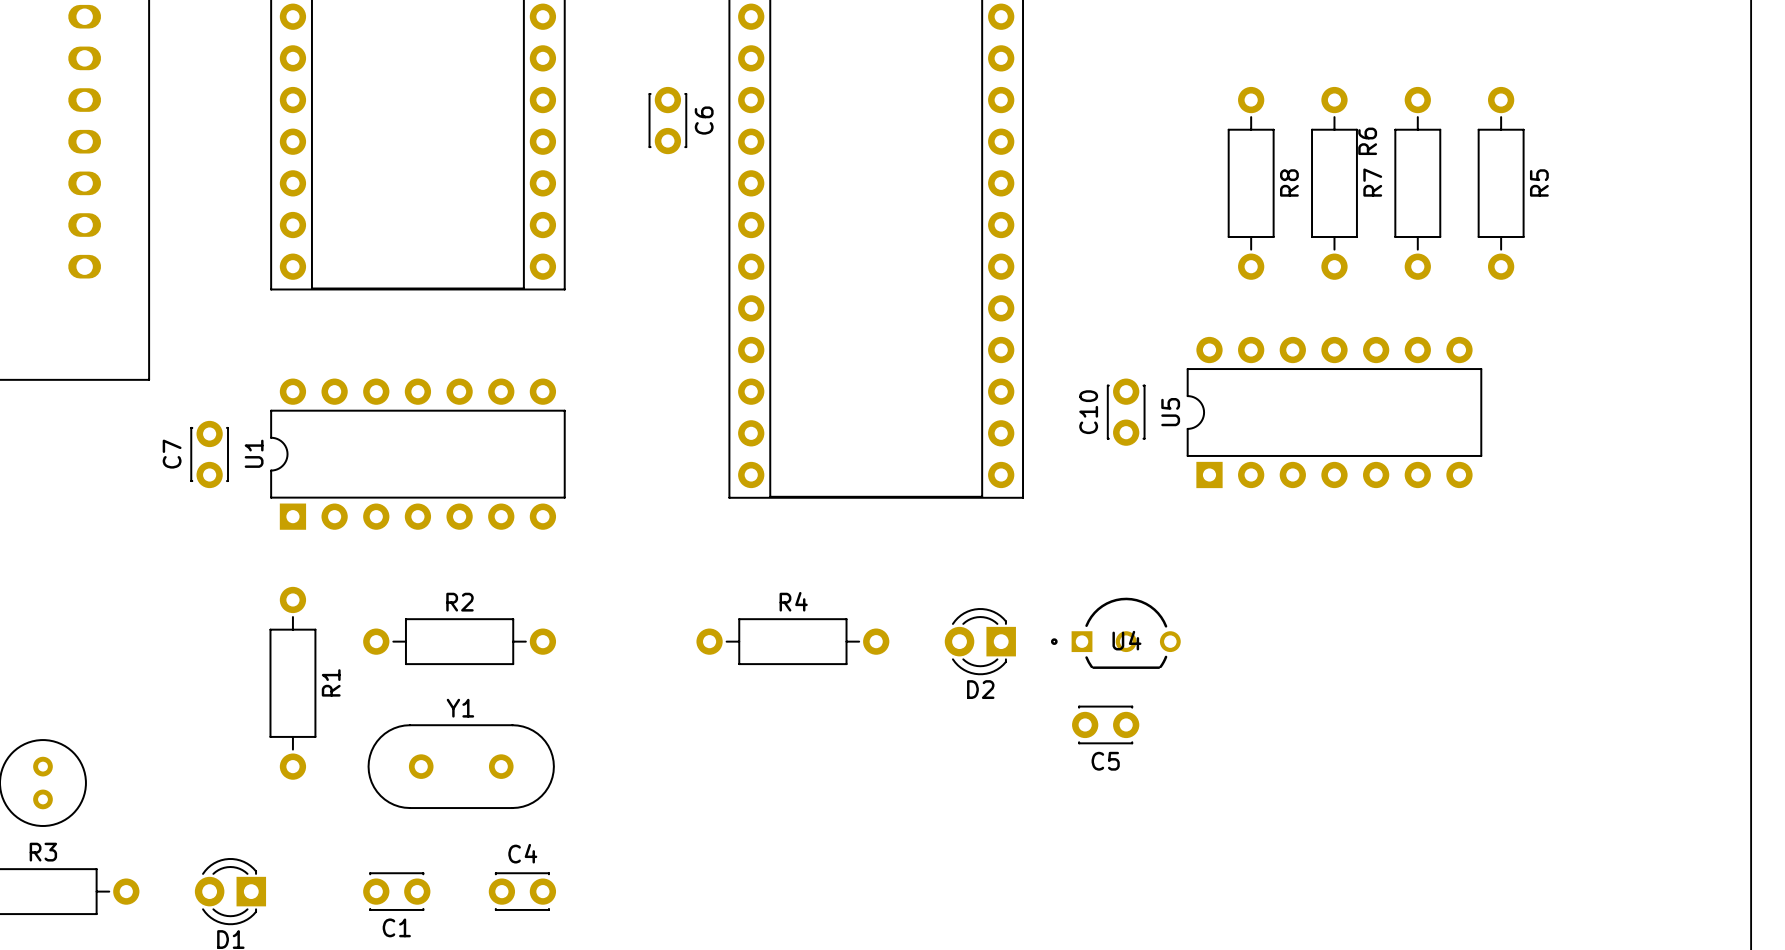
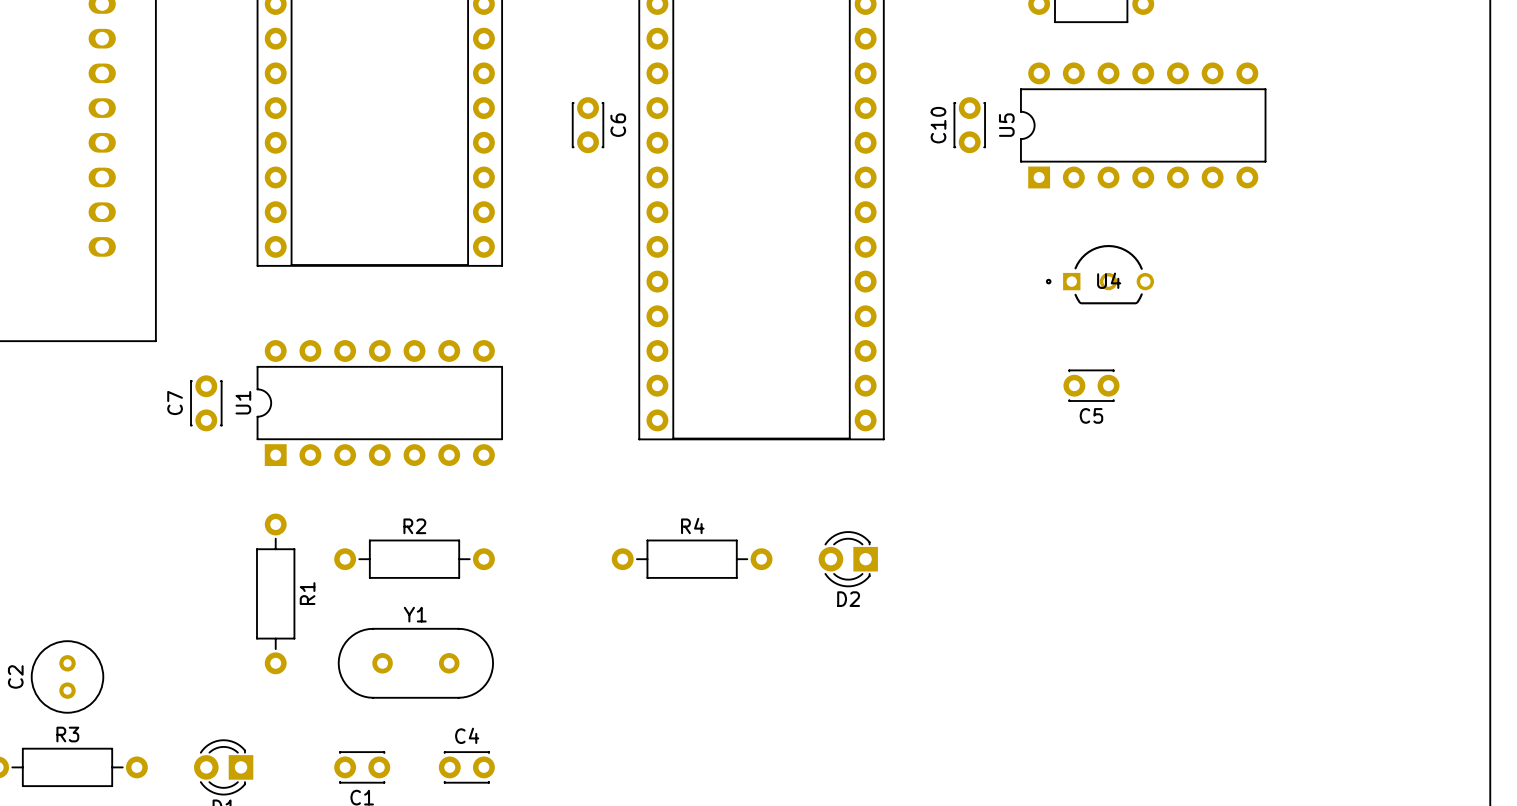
R8: (1251, 183) -> none
R7: (1334, 183) -> none
R6: (1417, 183) -> none
R5: (1501, 183) -> none
C10 position: (1126, 412) -> (969, 125)
U5 position: (1334, 412) -> (1143, 125)
U4 position: (1115, 633) -> (1099, 274)
C5 position: (1105, 724) -> (1091, 385)

